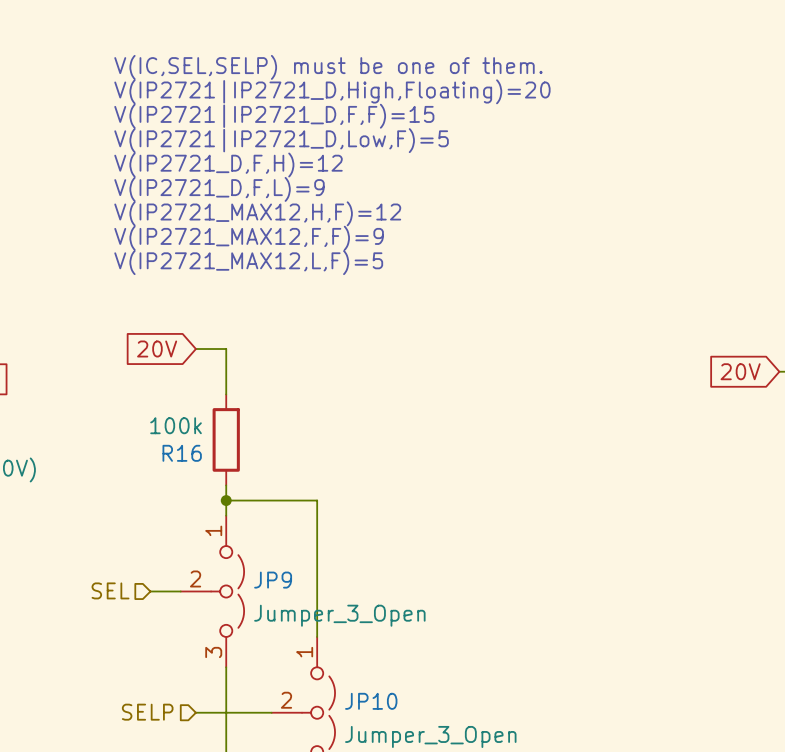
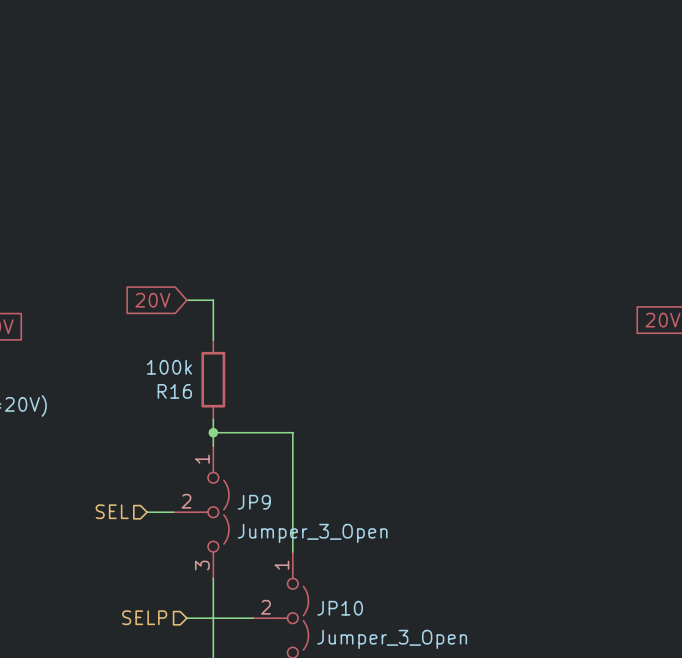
text: V(IC,SEL,SELP) must be one of them. (328, 67) -> none
text: V(IP2721|IP2721_D,High,Floating)=20 (332, 91) -> none
text: V(IP2721|IP2721_D,F,F)=15 (274, 116) -> none
text: V(IP2721|IP2721_D,Low,F)=5 (281, 140) -> none
text: V(IP2721_D,F,H)=12 (228, 165) -> none
text: V(IP2721_D,F,L)=9 (219, 189) -> none
text: V(IP2721_MAX12,H,F)=12 (257, 213) -> none
text: V(IP2721_MAX12,F,F)=9 (249, 238) -> none
text: V(IP2721_MAX12,L,F)=5 (248, 262) -> none

